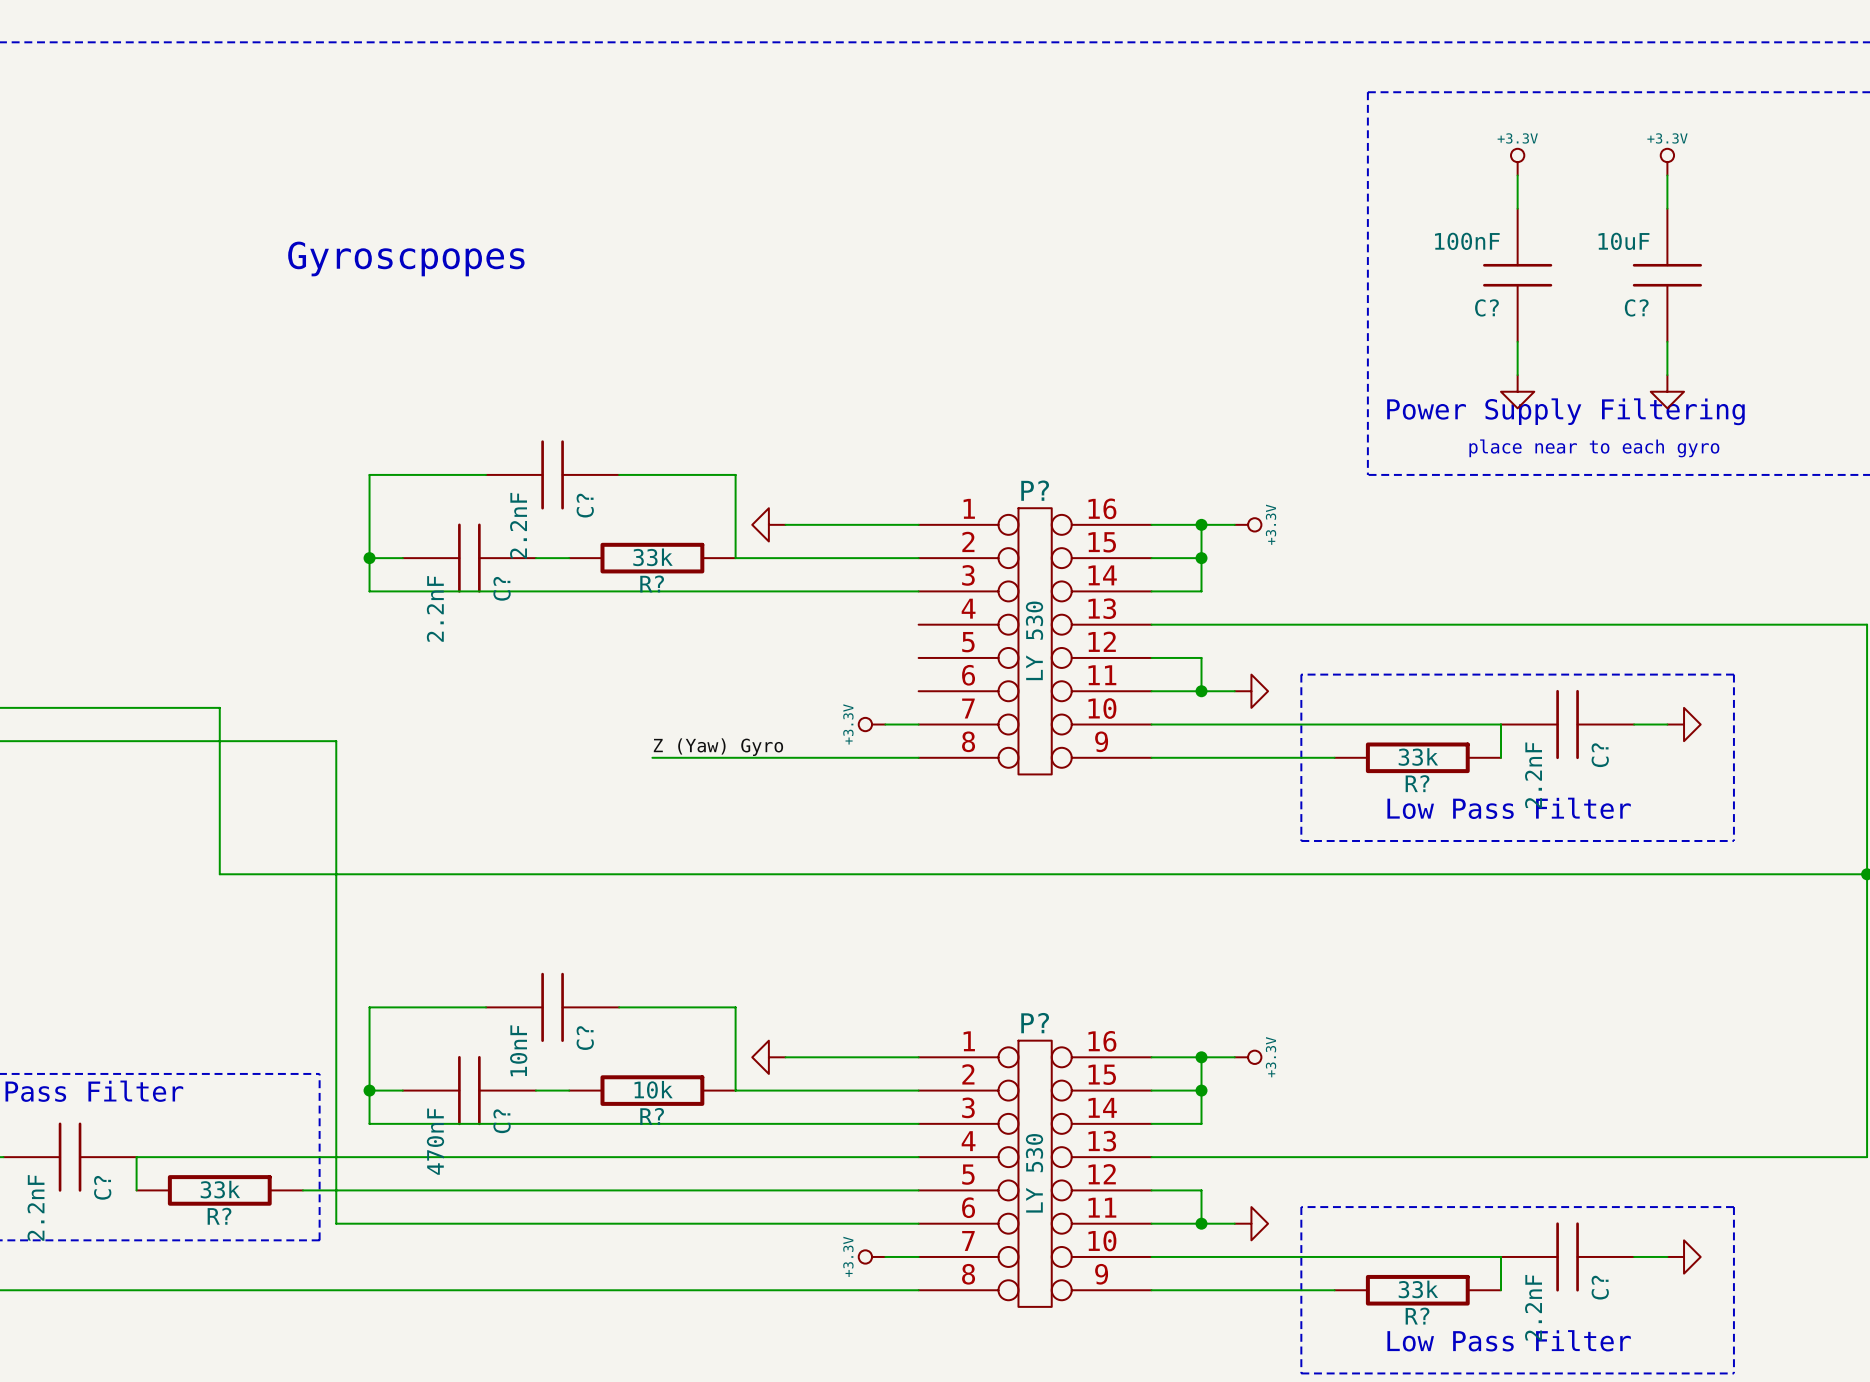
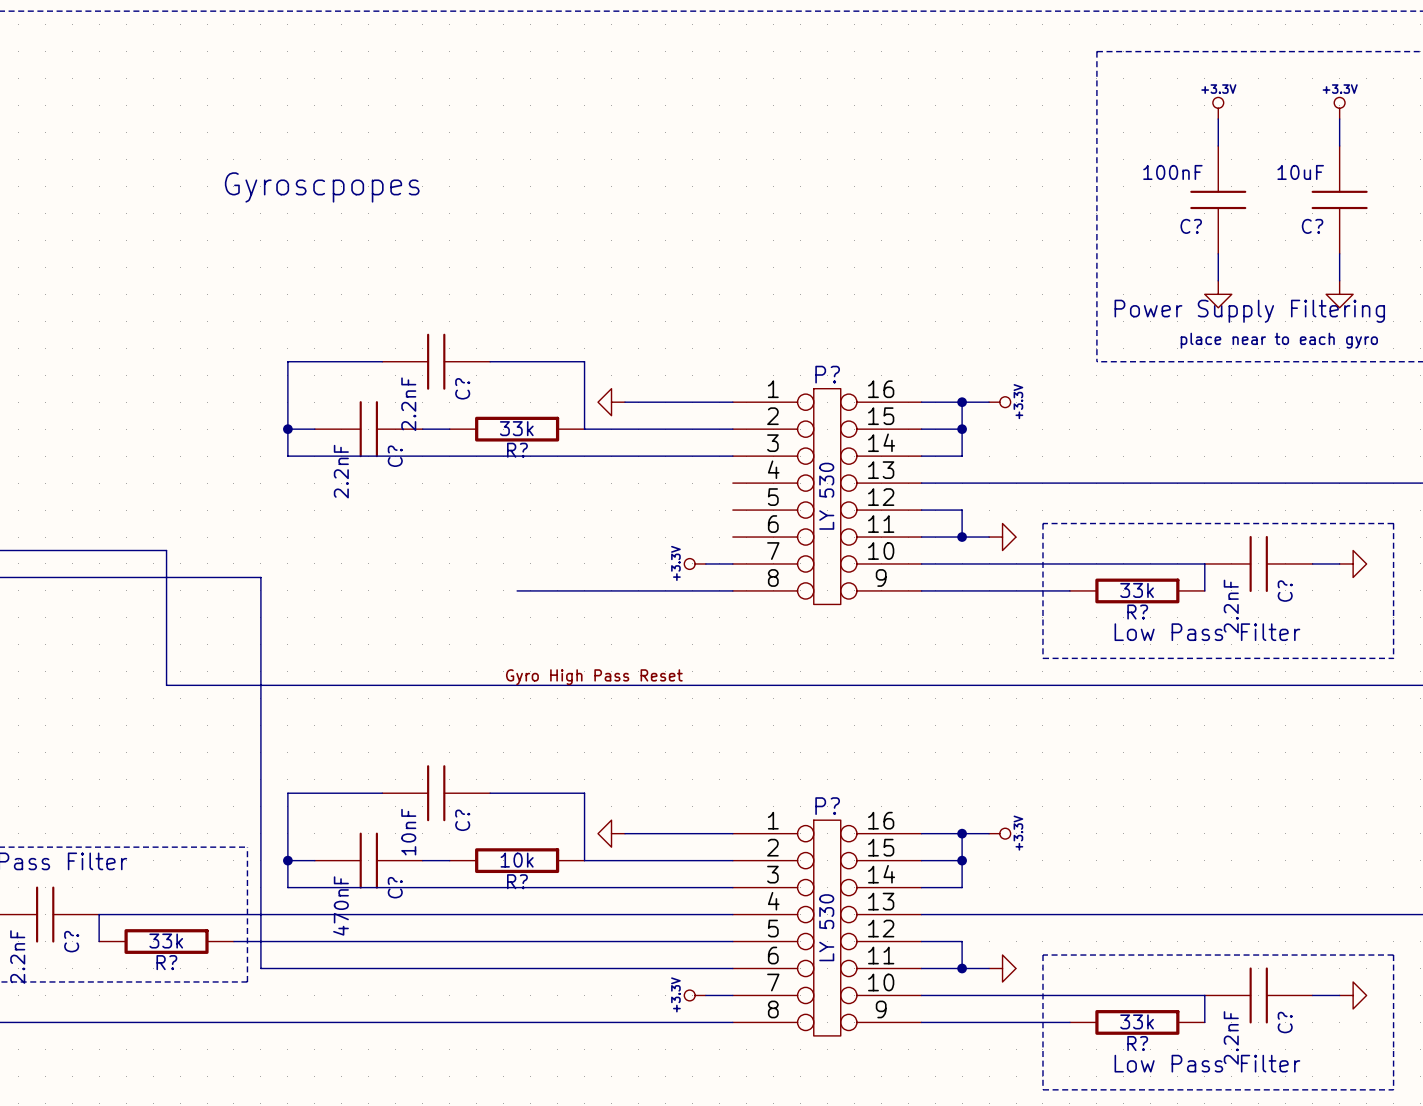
label: Z (Yaw) Gyro (718, 747) -> none
label: none -> Gyro High Pass Reset (594, 677)

